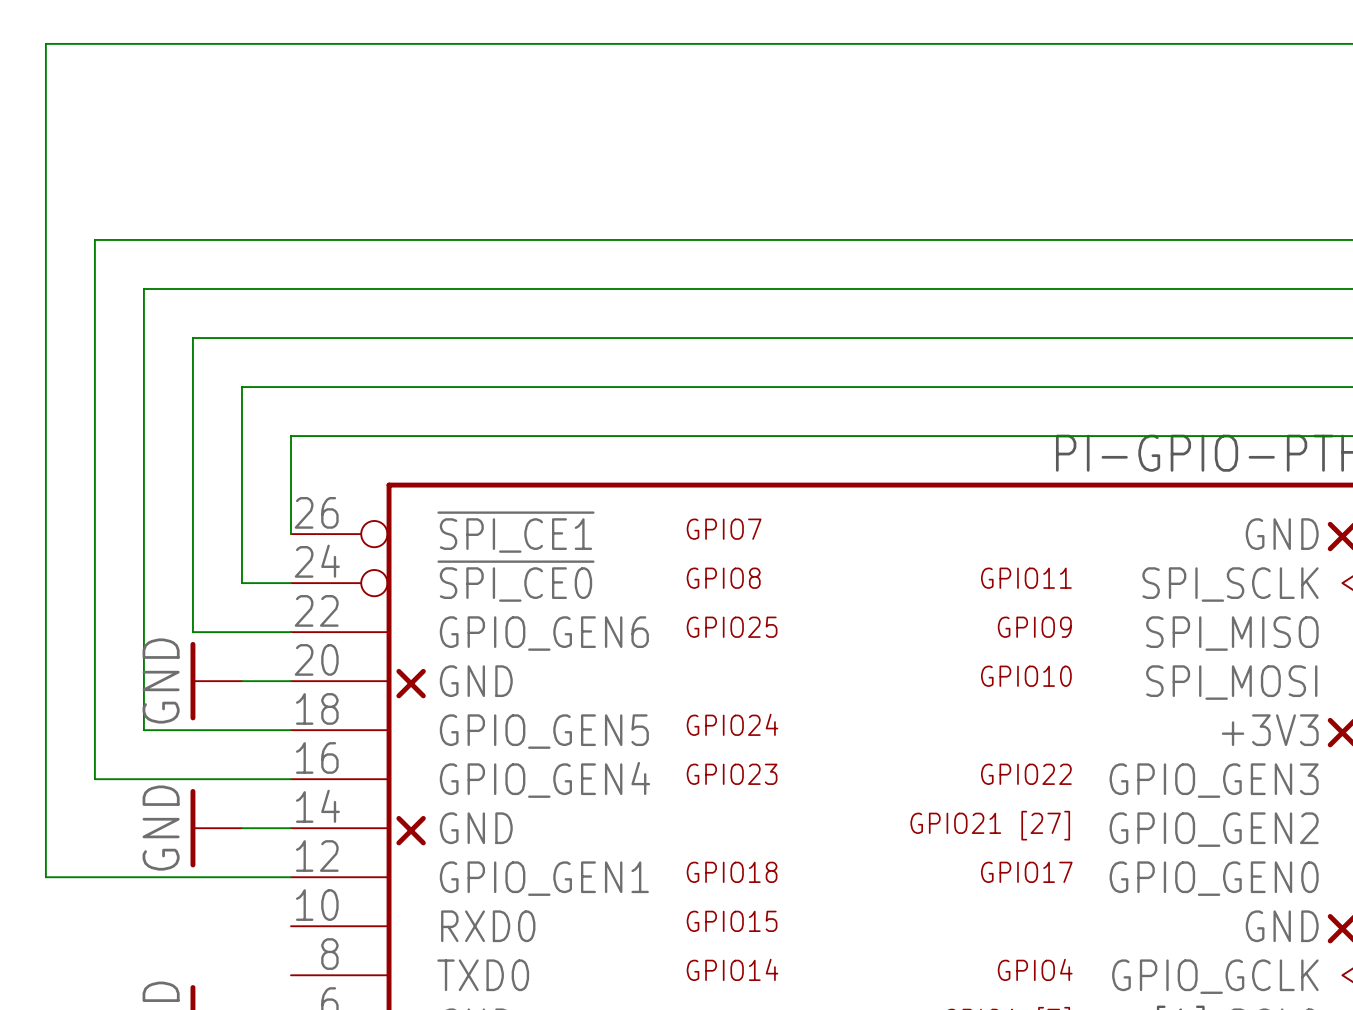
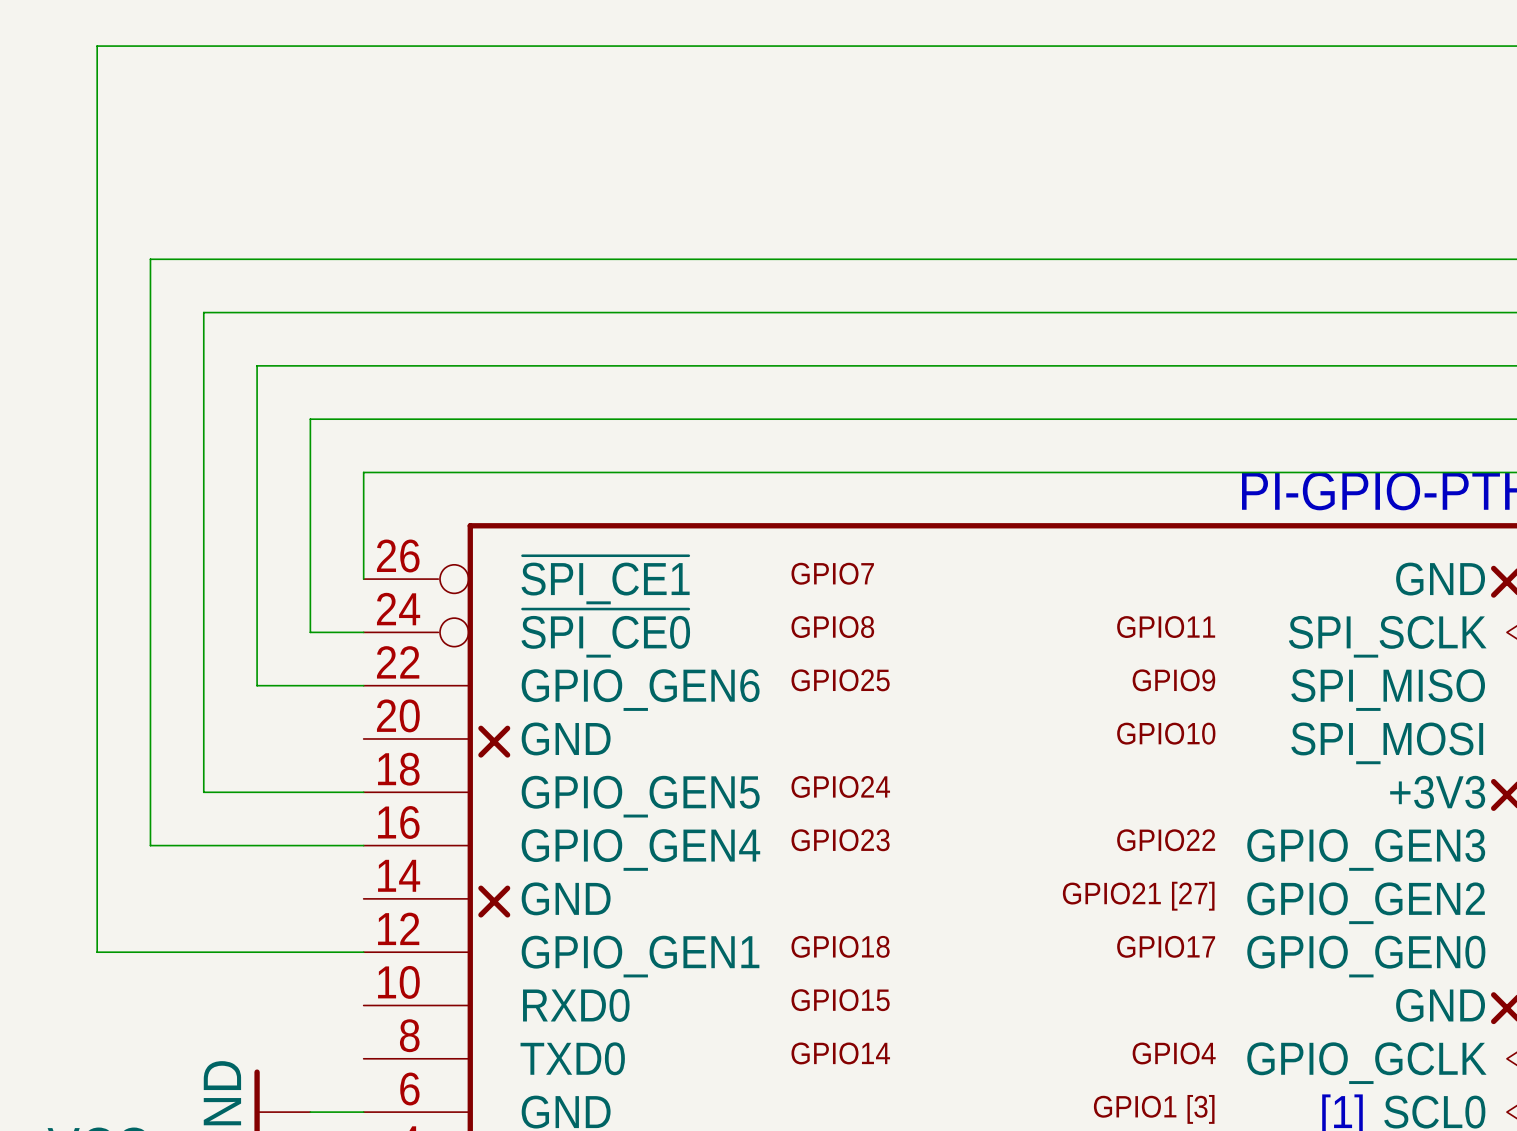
power symbol: GND (216, 681) -> none
wire: (241, 681) (291, 681) -> none
power symbol: GND (216, 828) -> none
wire: (241, 828) (291, 828) -> none

